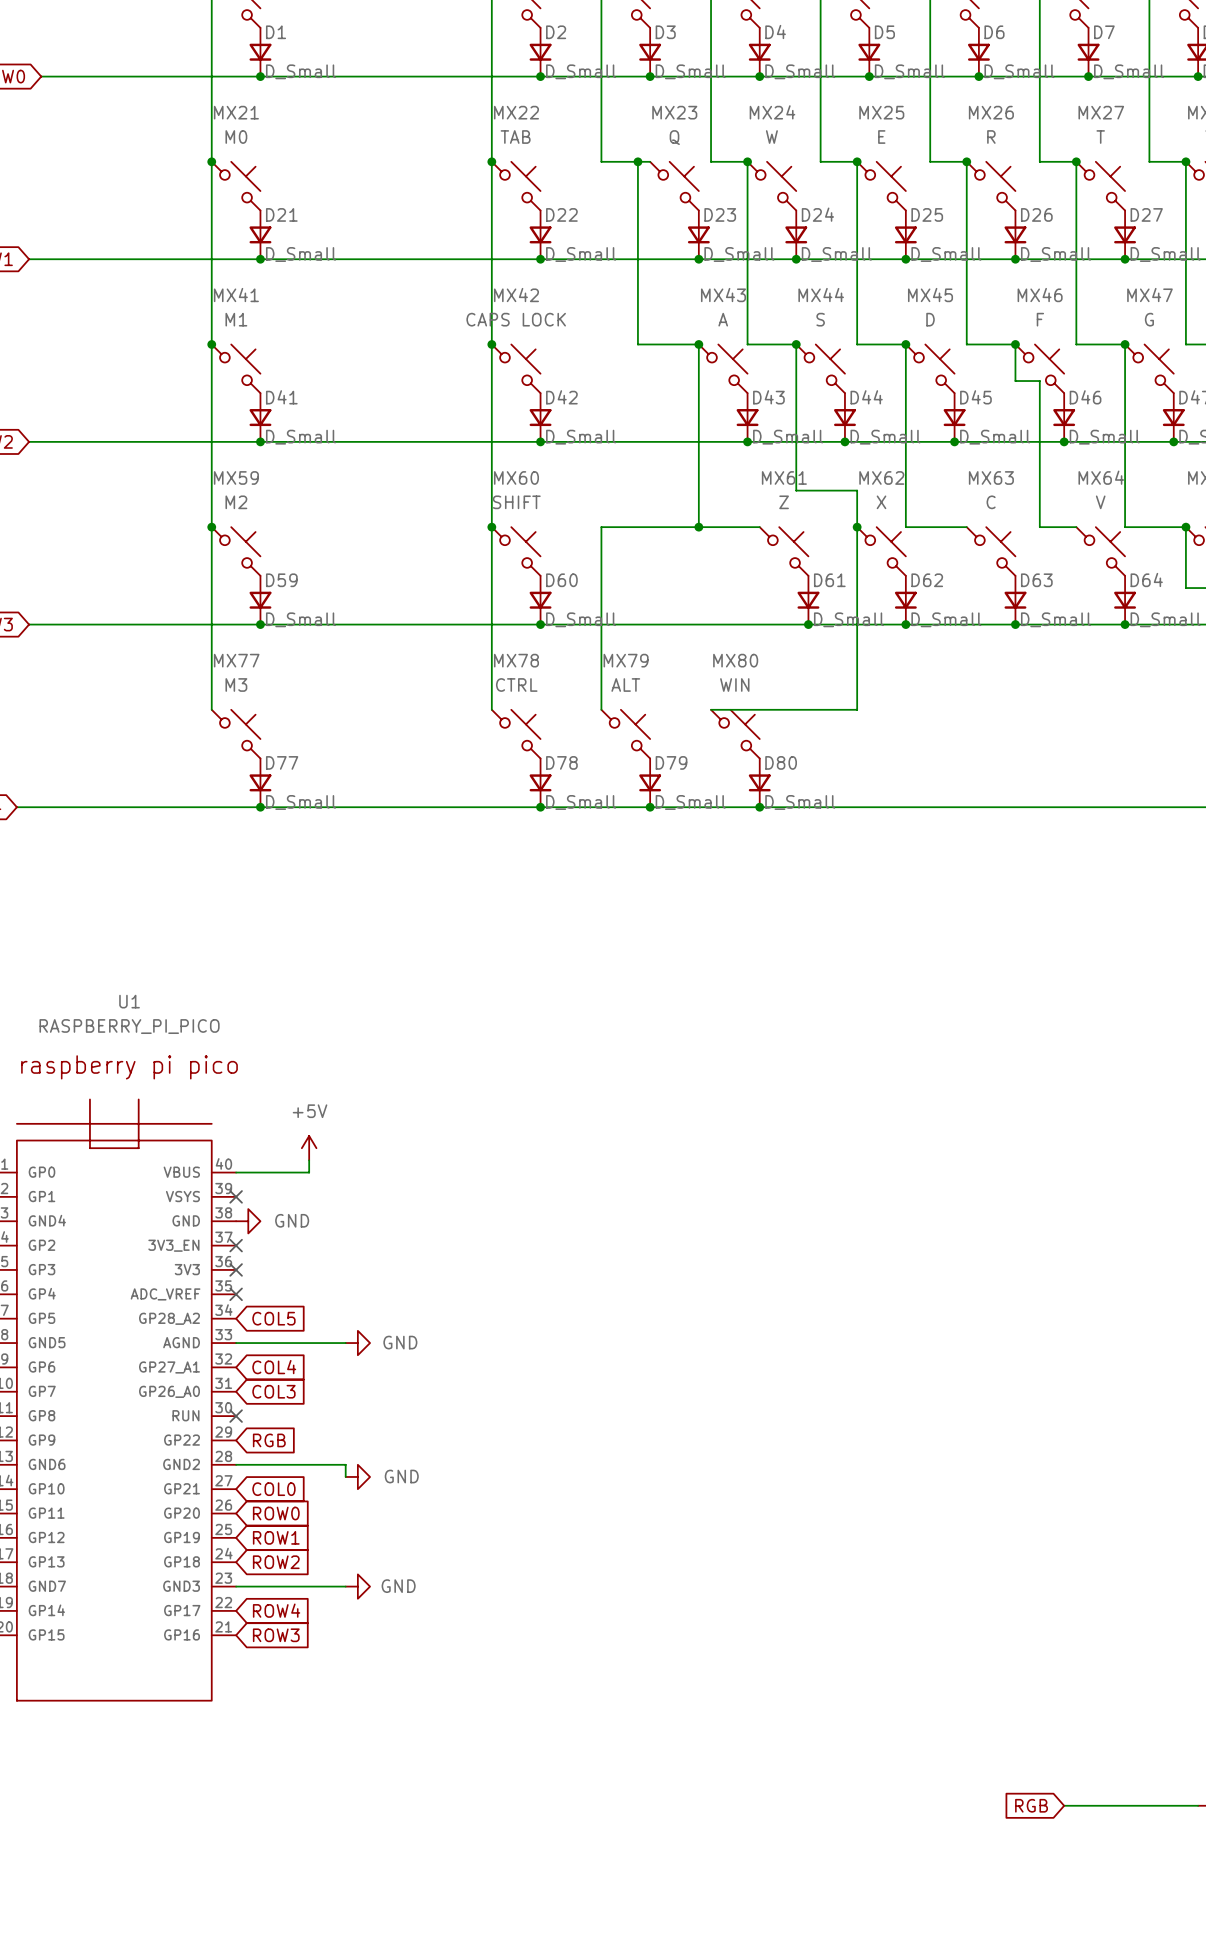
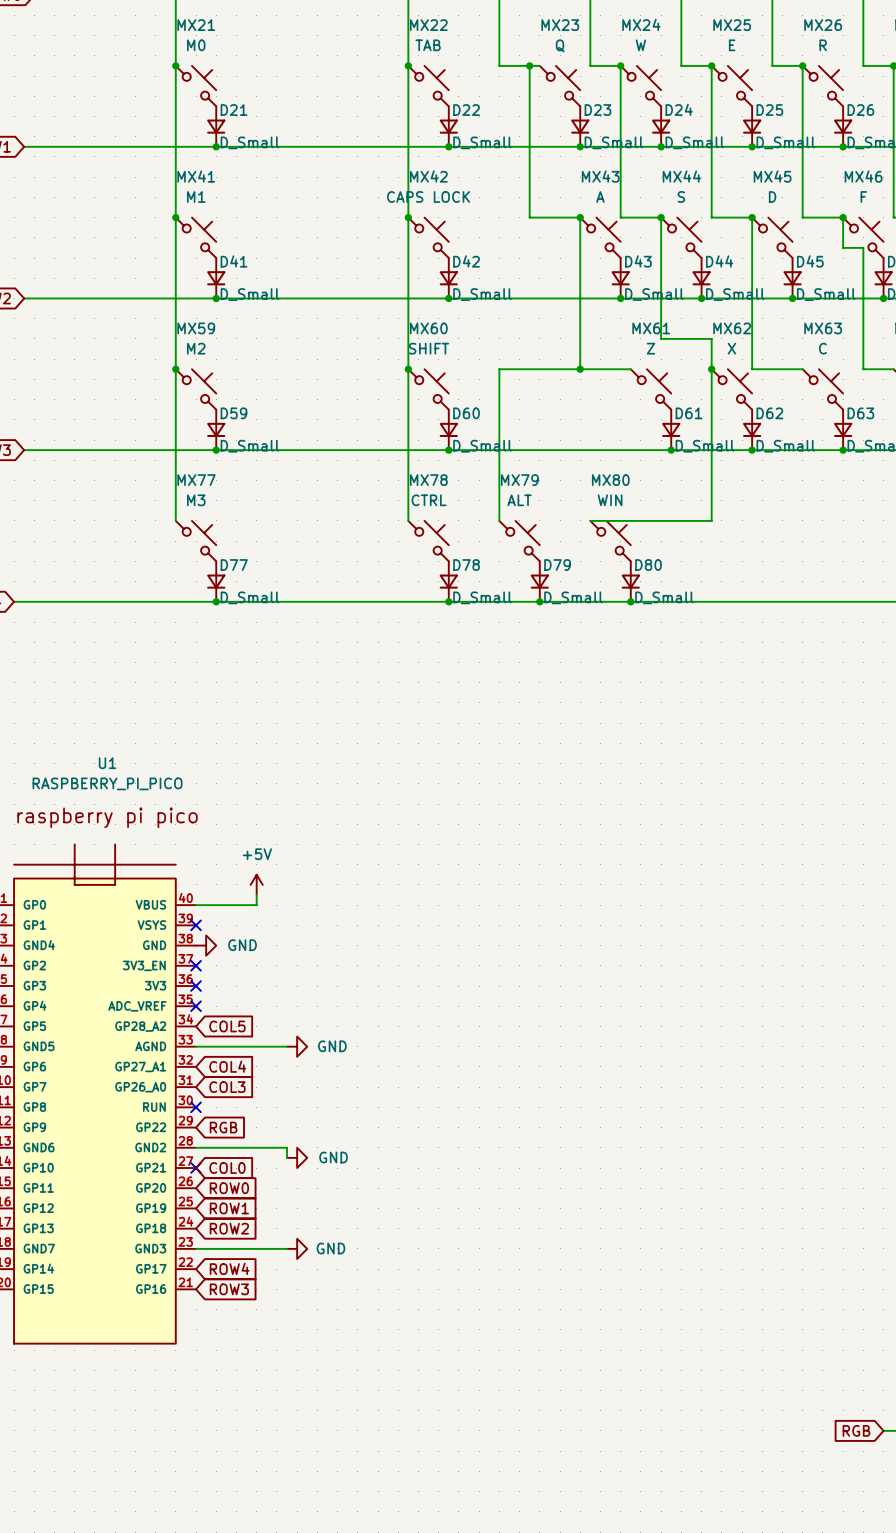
no-connect mark: none -> (196, 1168)

